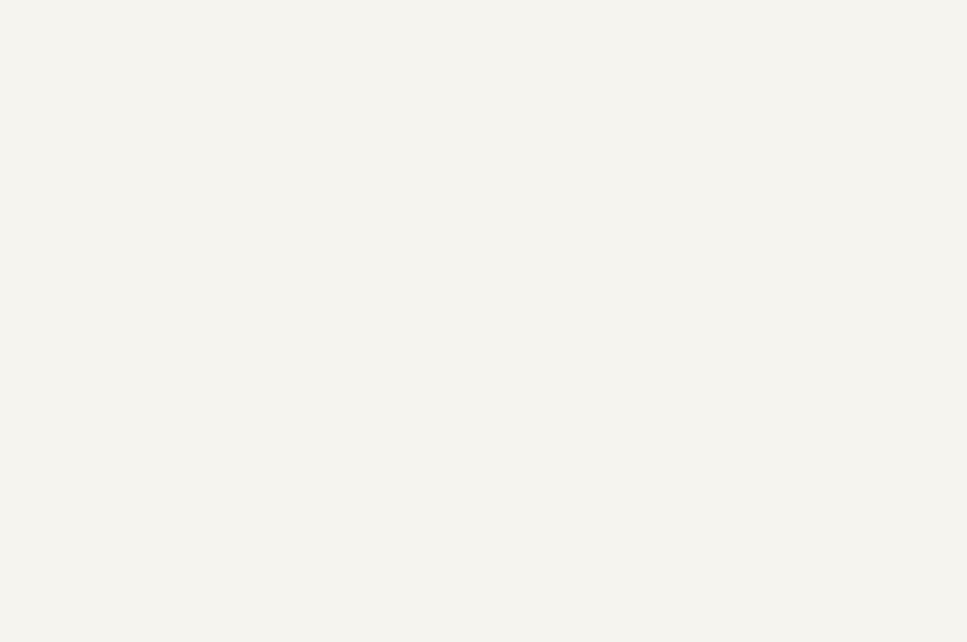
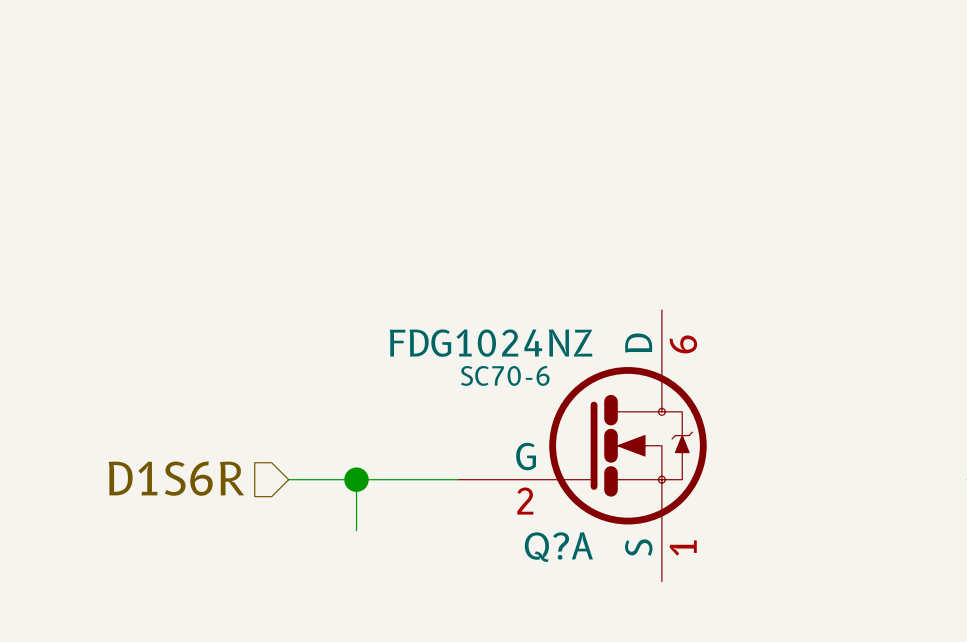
Q?A: none -> FDG1024NZ (582, 445)
hierarchical label: none -> D1S6R (176, 478)
wire: none -> (288, 479) (458, 479)
wire: none -> (356, 479) (356, 530)
junction: none -> (356, 479)

